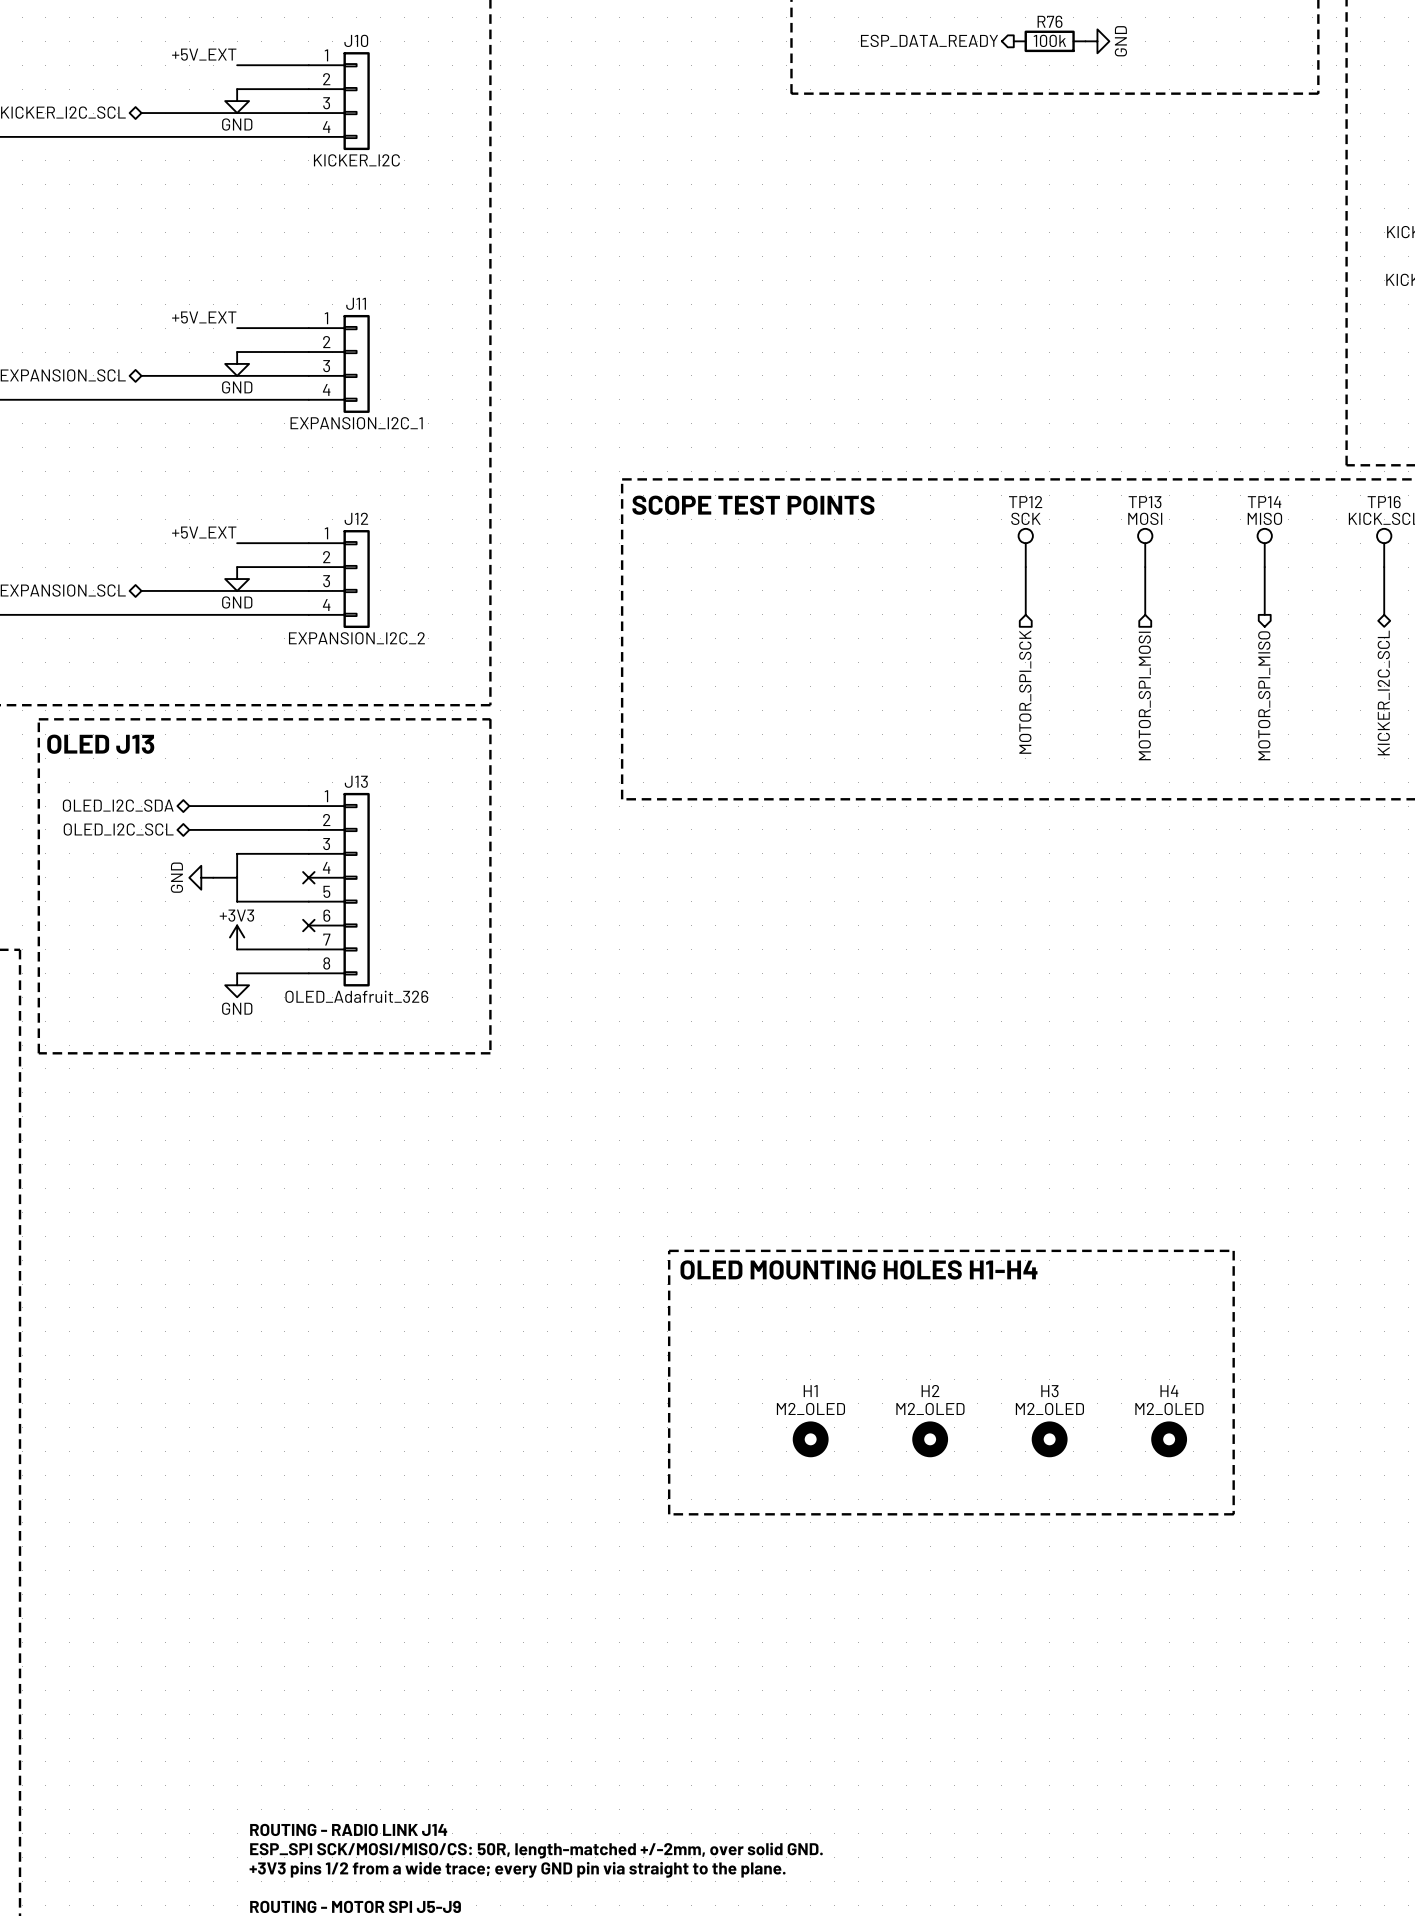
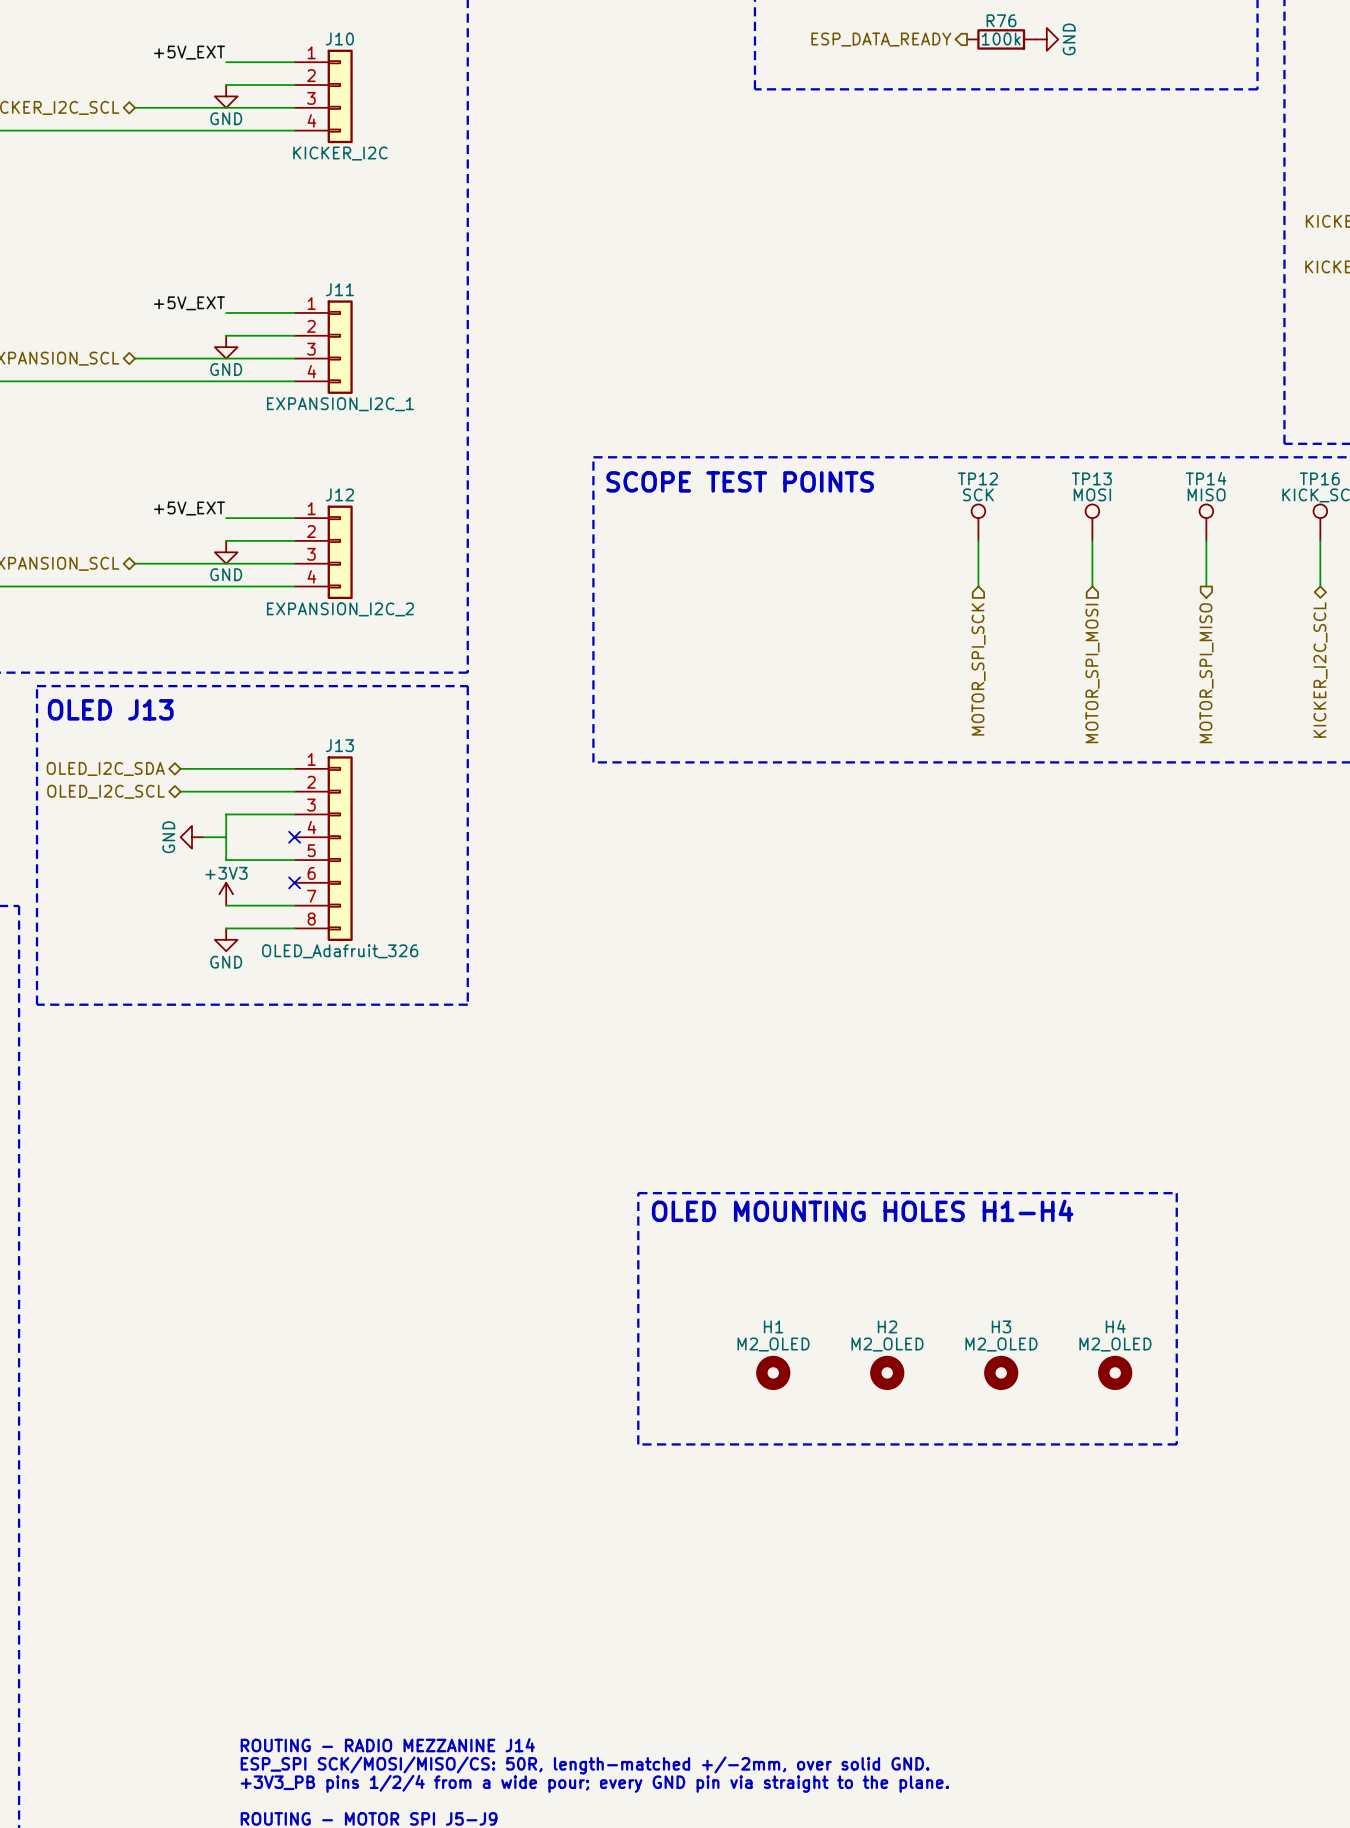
text: ROUTING - RADIO LINK J14 (348, 1829) -> ROUTING - RADIO MEZZANINE J14 (387, 1745)
text: +3V3 pins 1/2 from a wide trace; every GND pin via straight to the plane. (517, 1869) -> +3V3_PB pins 1/2/4 from a wide pour; every GND pin via straight to the plane. (594, 1783)

